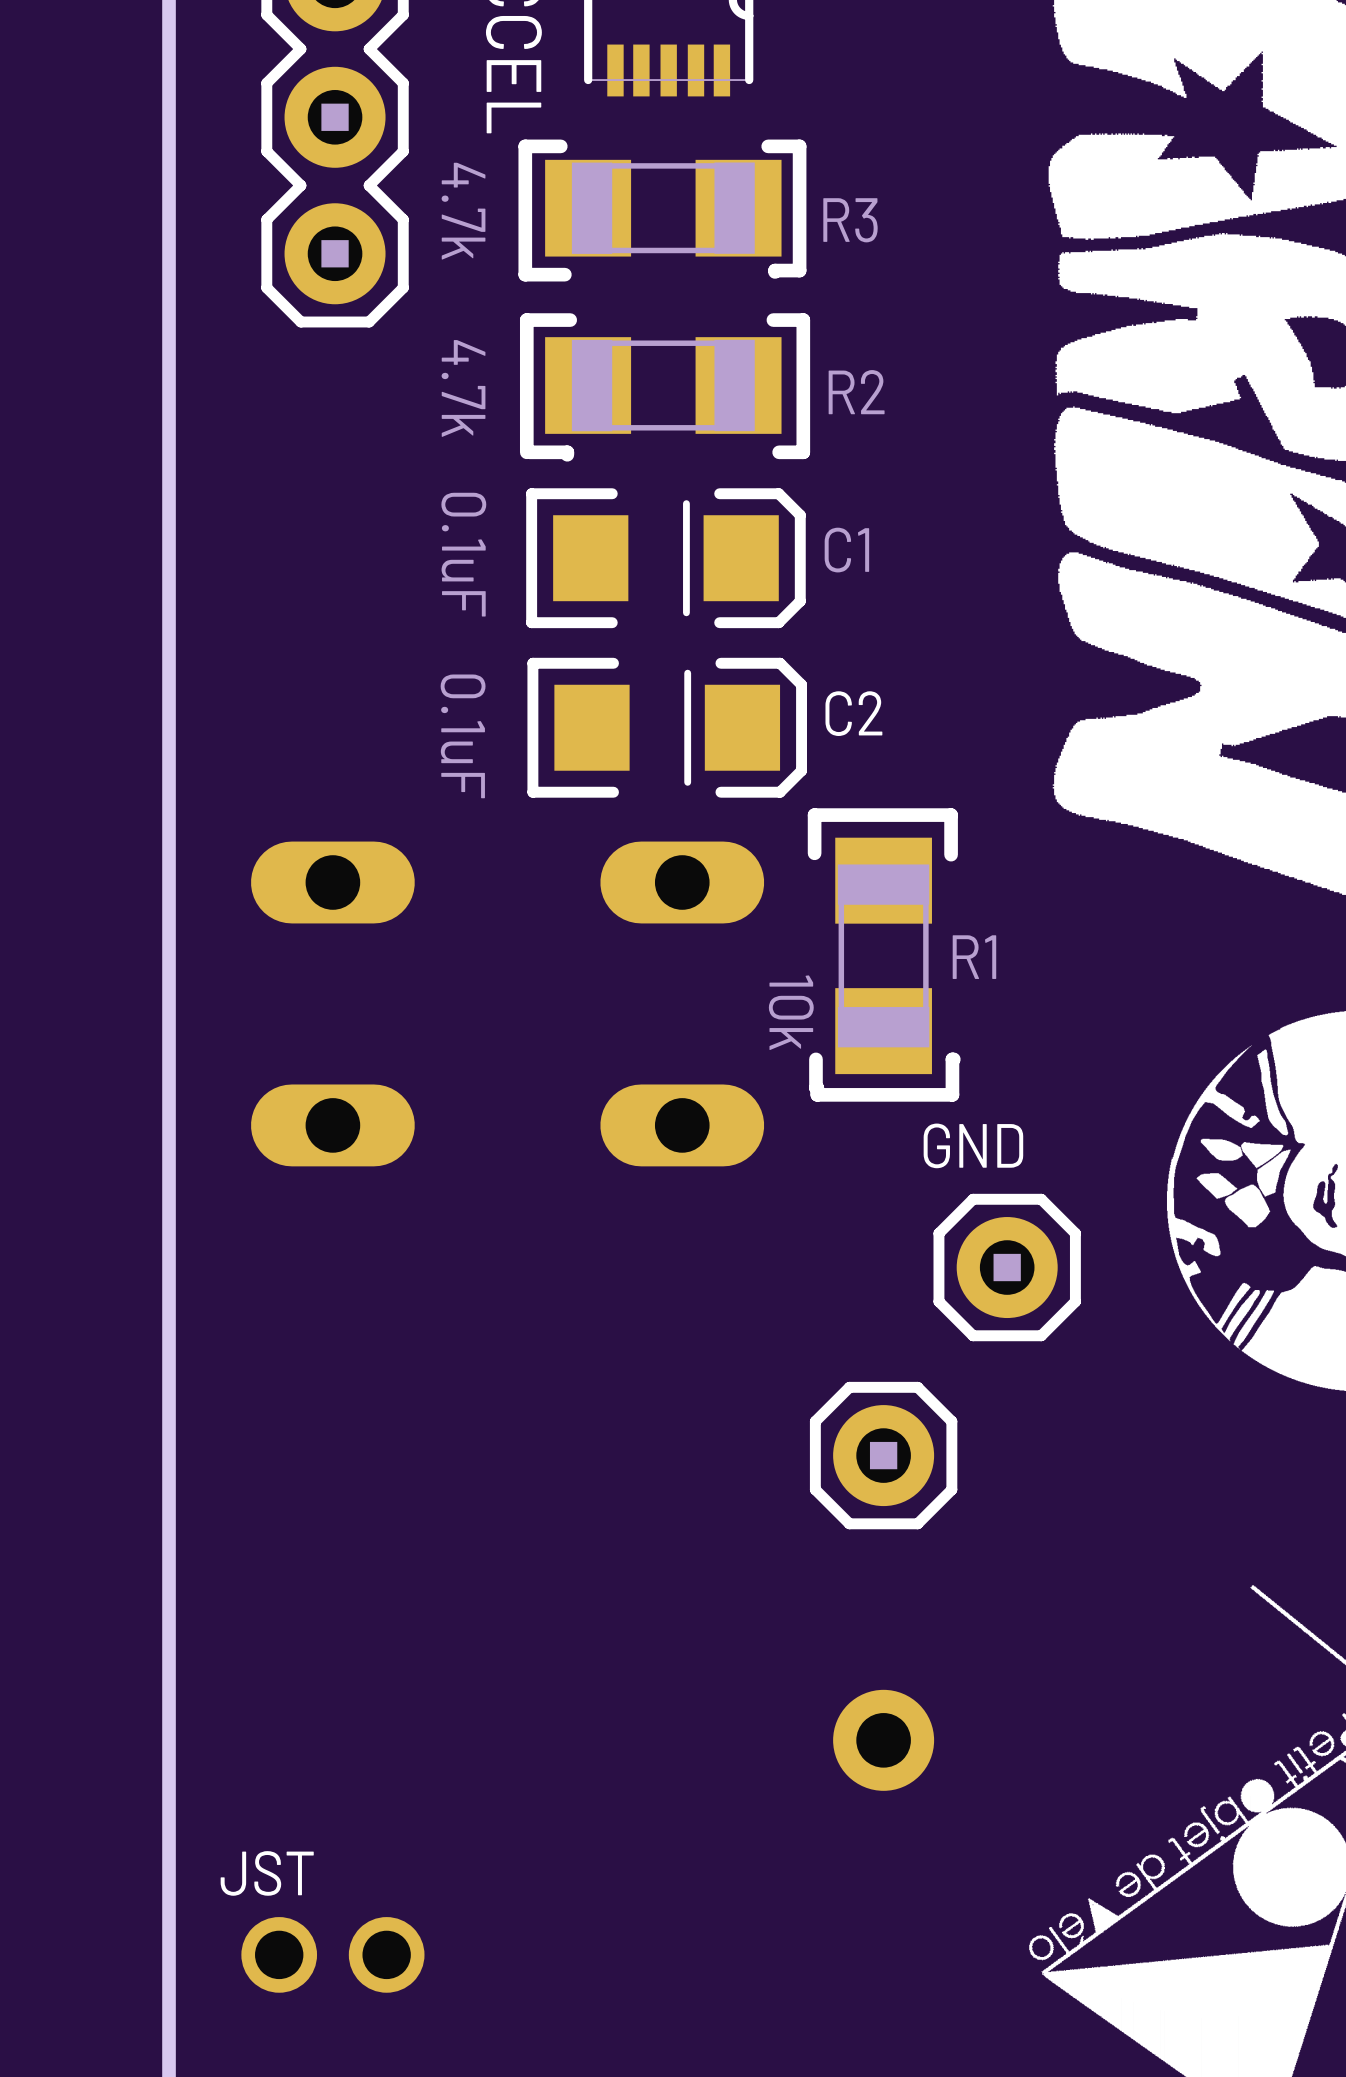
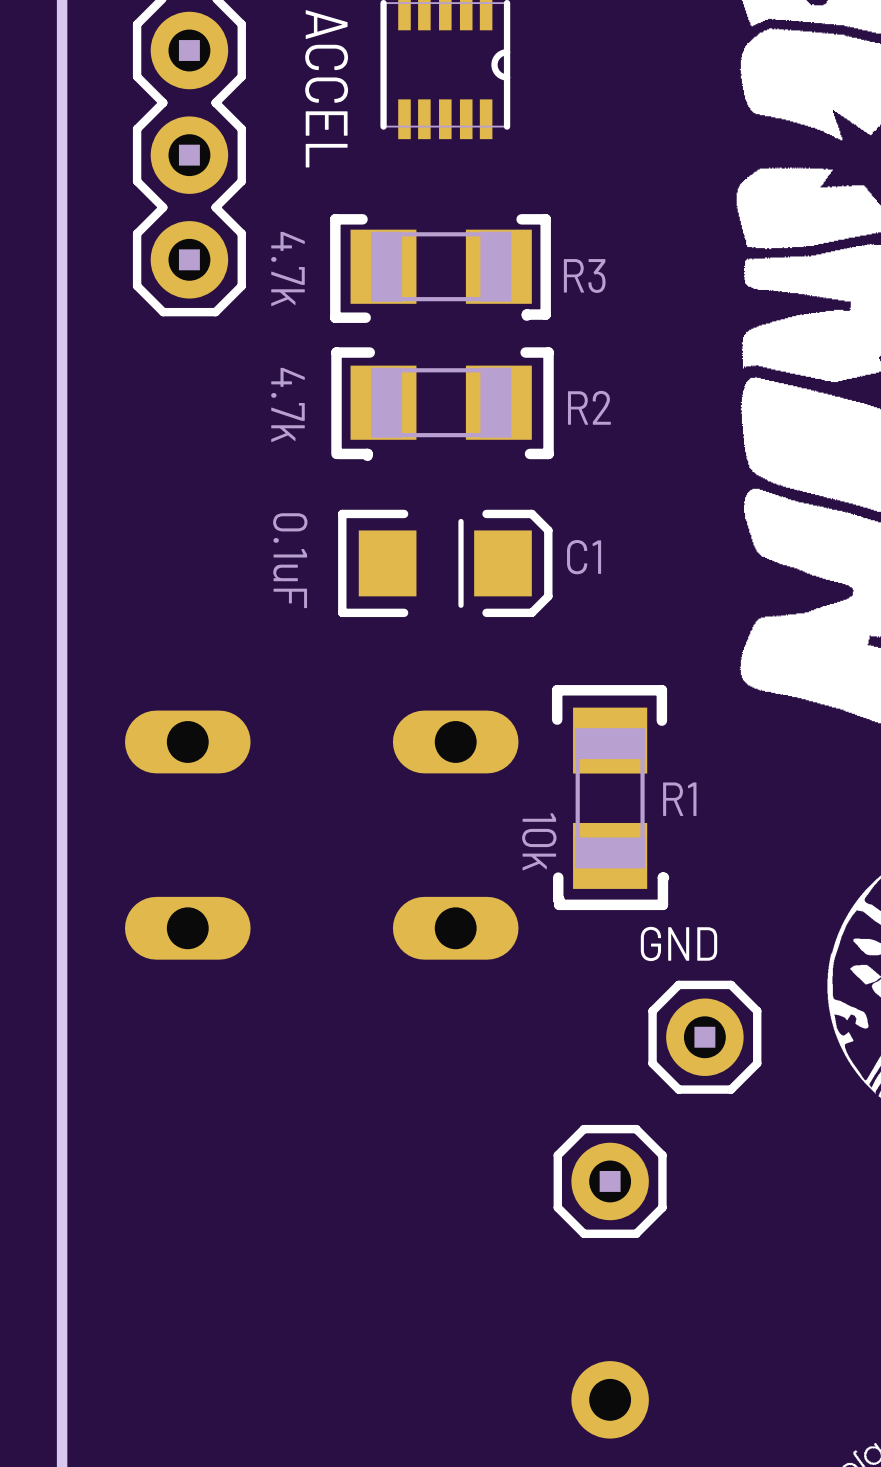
line: (560, 146) (525, 146) (525, 200) -> (362, 219) (335, 219)
line: (768, 146) (799, 146) (799, 200) -> (521, 219) (545, 219)
part position: (663, 208) -> (441, 266)
text position: R3 (850, 220) -> R3 (584, 276)
line: (799, 270) (775, 271) -> (545, 272) (545, 314) (526, 315)
line: (525, 274) (564, 274) -> (335, 275) (335, 317) (365, 317)
line: (570, 320) (526, 320) (526, 374) -> (369, 352) (336, 352)
line: (773, 320) (803, 320) (803, 374) -> (525, 352) (548, 352)
part position: (663, 385) -> (441, 402)
text position: R2 (856, 392) -> R2 (589, 407)
line: none -> (336, 412) (336, 453)
line: (529, 452) (567, 452) (567, 454) -> (338, 453) (367, 453) (367, 455)
line: (779, 452) (803, 452) -> (530, 453) (548, 453) (548, 412)
text position: C1 (846, 550) -> C1 (584, 557)
part position: (665, 558) -> (445, 563)
C2: 0.1uF (667, 727) -> none

